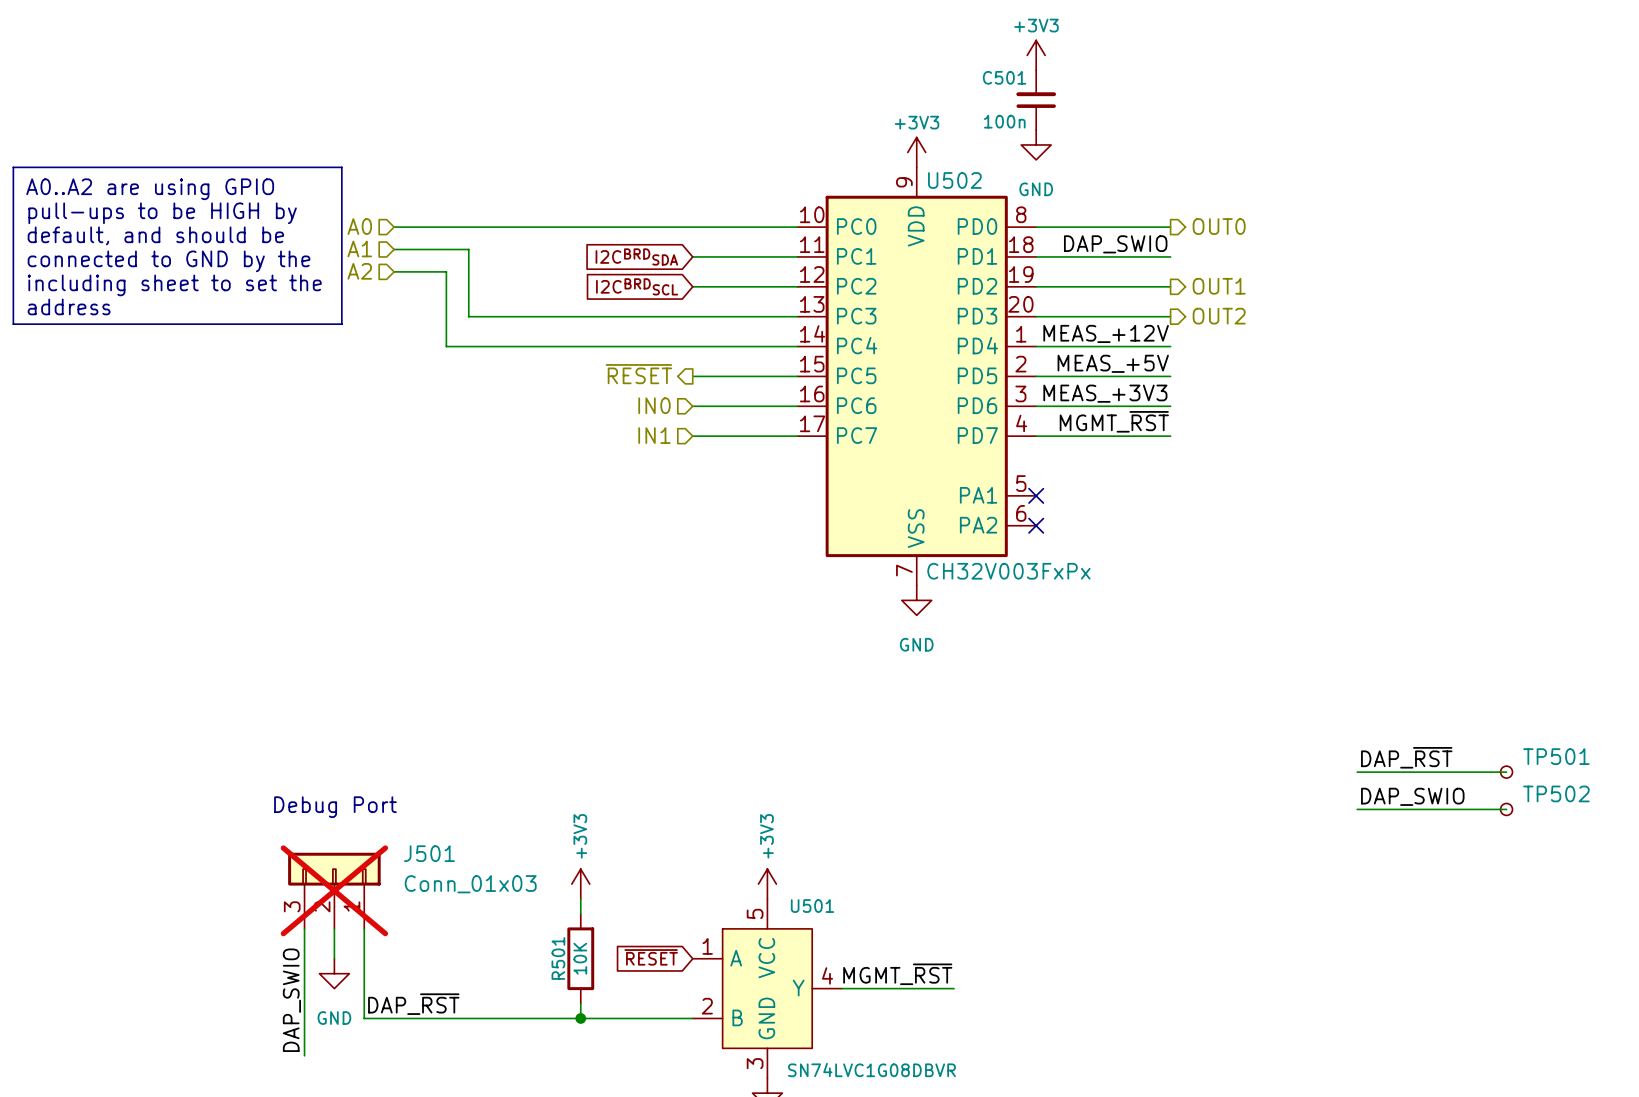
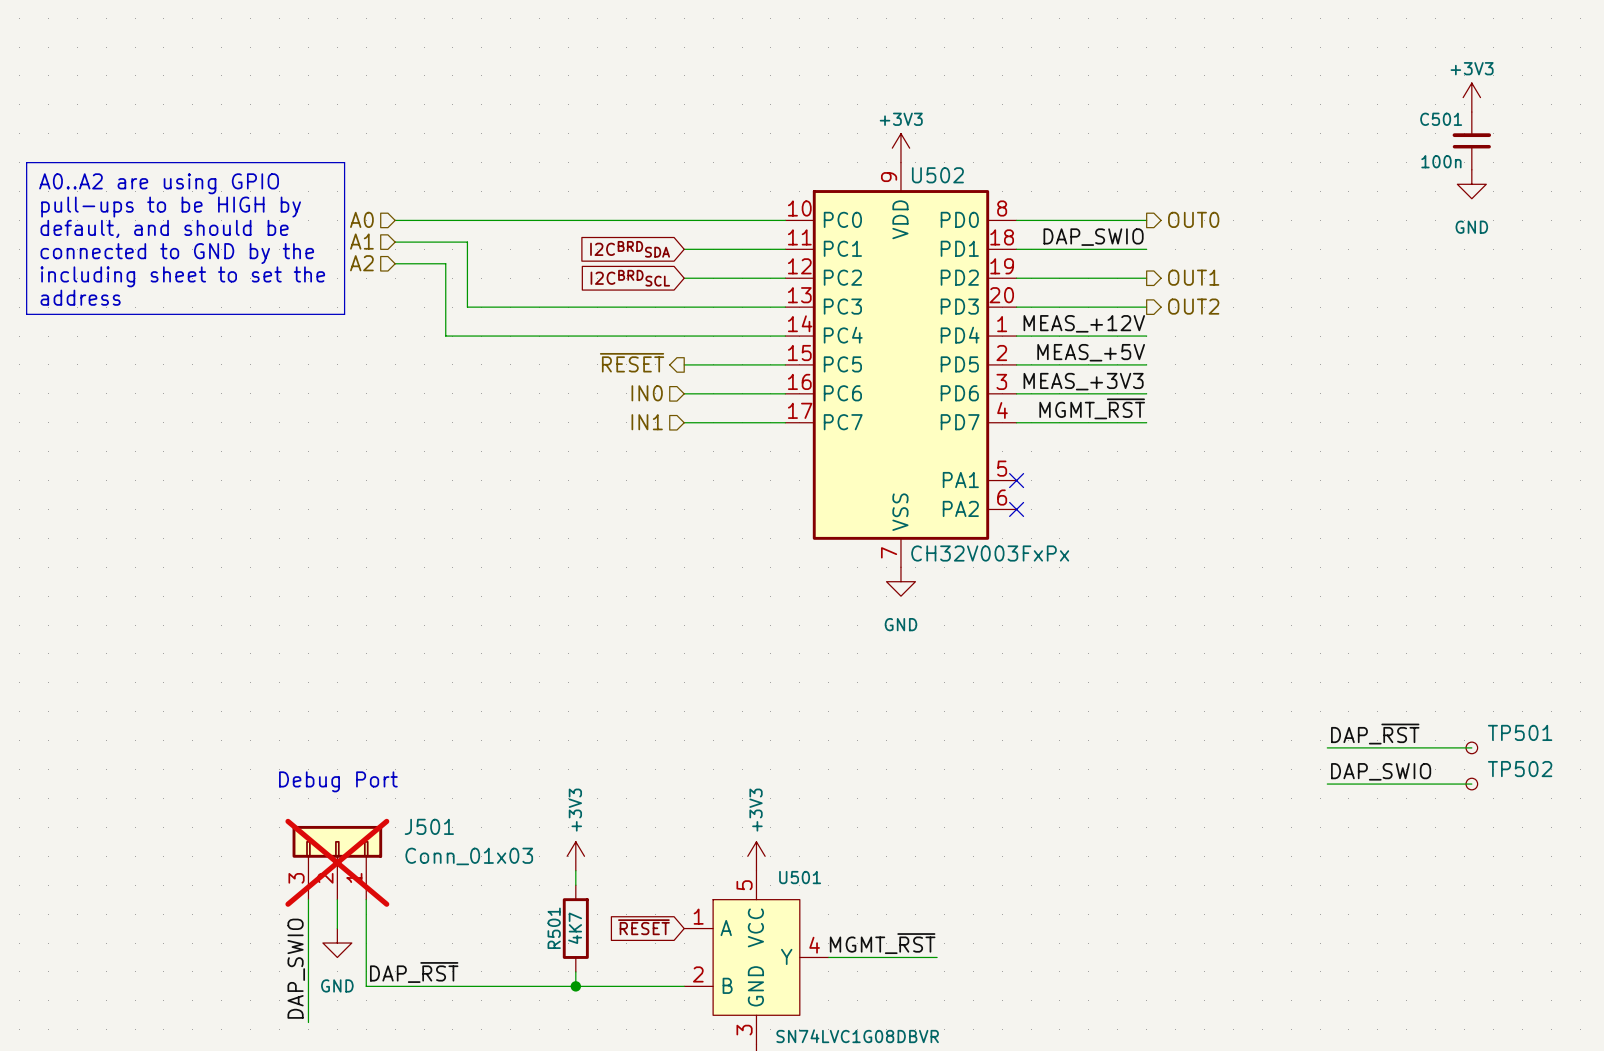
power symbol: +3V3 (1036, 55) -> none
C501 position: (1036, 100) -> (1471, 140)
power symbol: none -> +3V3 (1471, 97)
power symbol: GND (1036, 144) -> none
power symbol: none -> GND (1471, 184)
R501 value: 10K (580, 958) -> 4K7 (575, 928)

